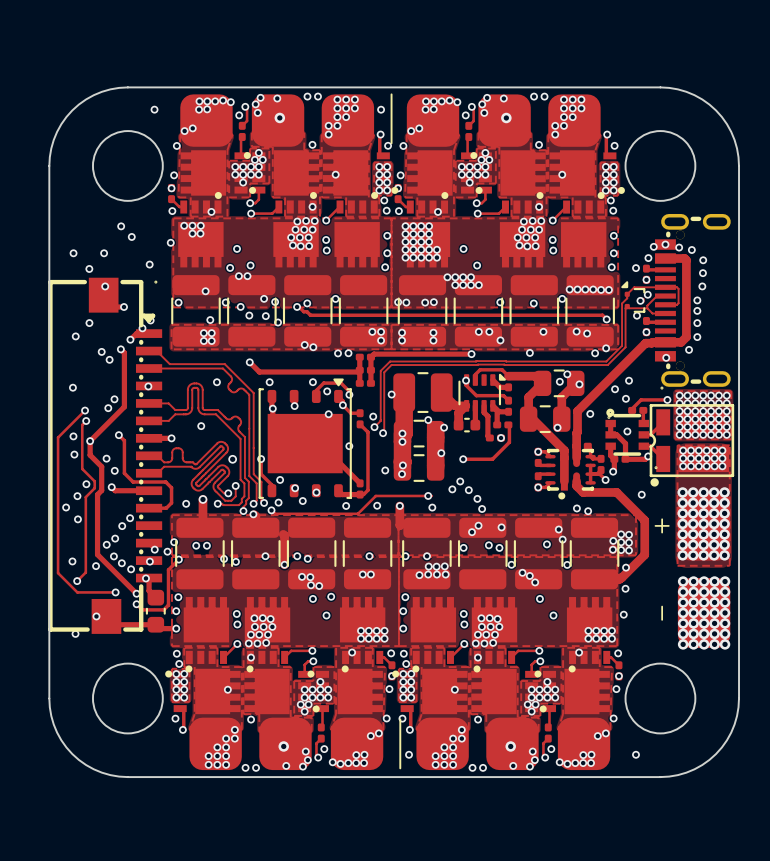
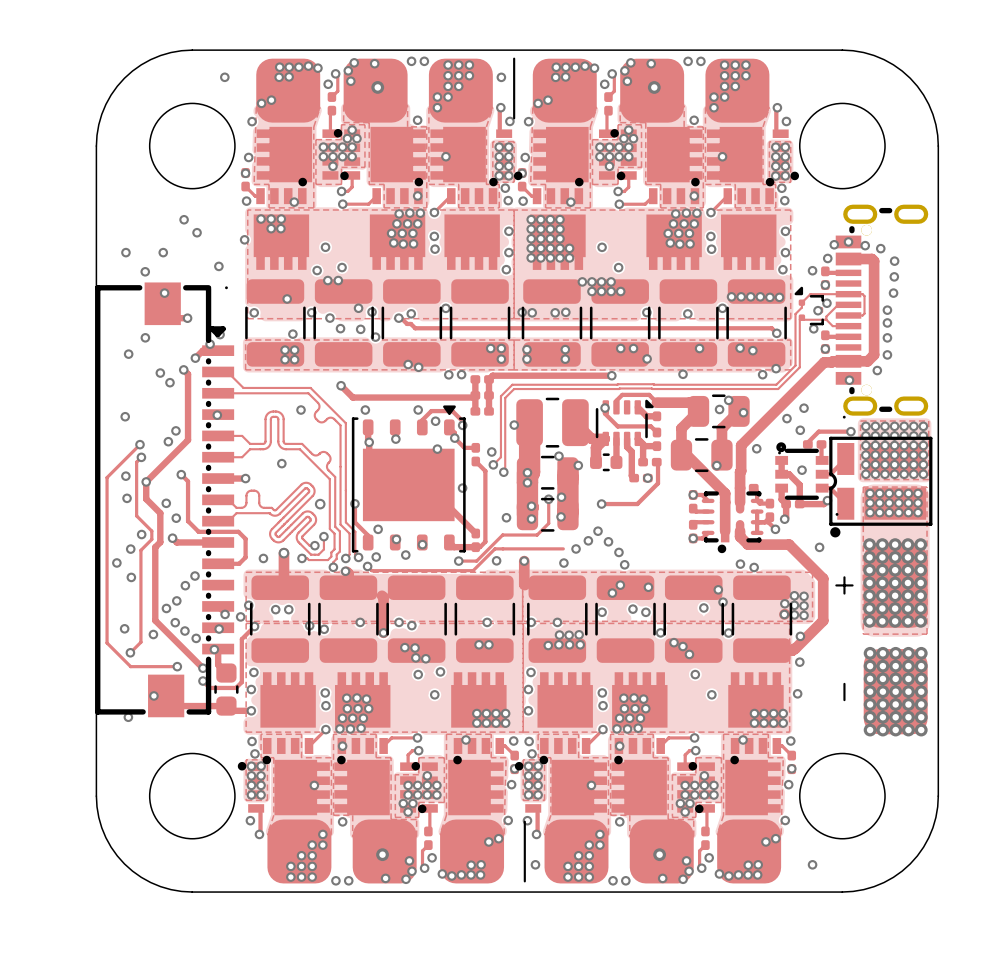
via: none -> (561, 497)
via: (441, 453) -> none
track: none -> (548, 499) (548, 523) (537, 535) (502, 535) (476, 561) (458, 561)
via: none -> (548, 499)
via: none -> (531, 506)
via: (402, 465) -> none
via: none -> (561, 516)
via: none -> (531, 519)
via: (402, 474) -> none
via: (428, 495) -> none
via: none -> (576, 548)

